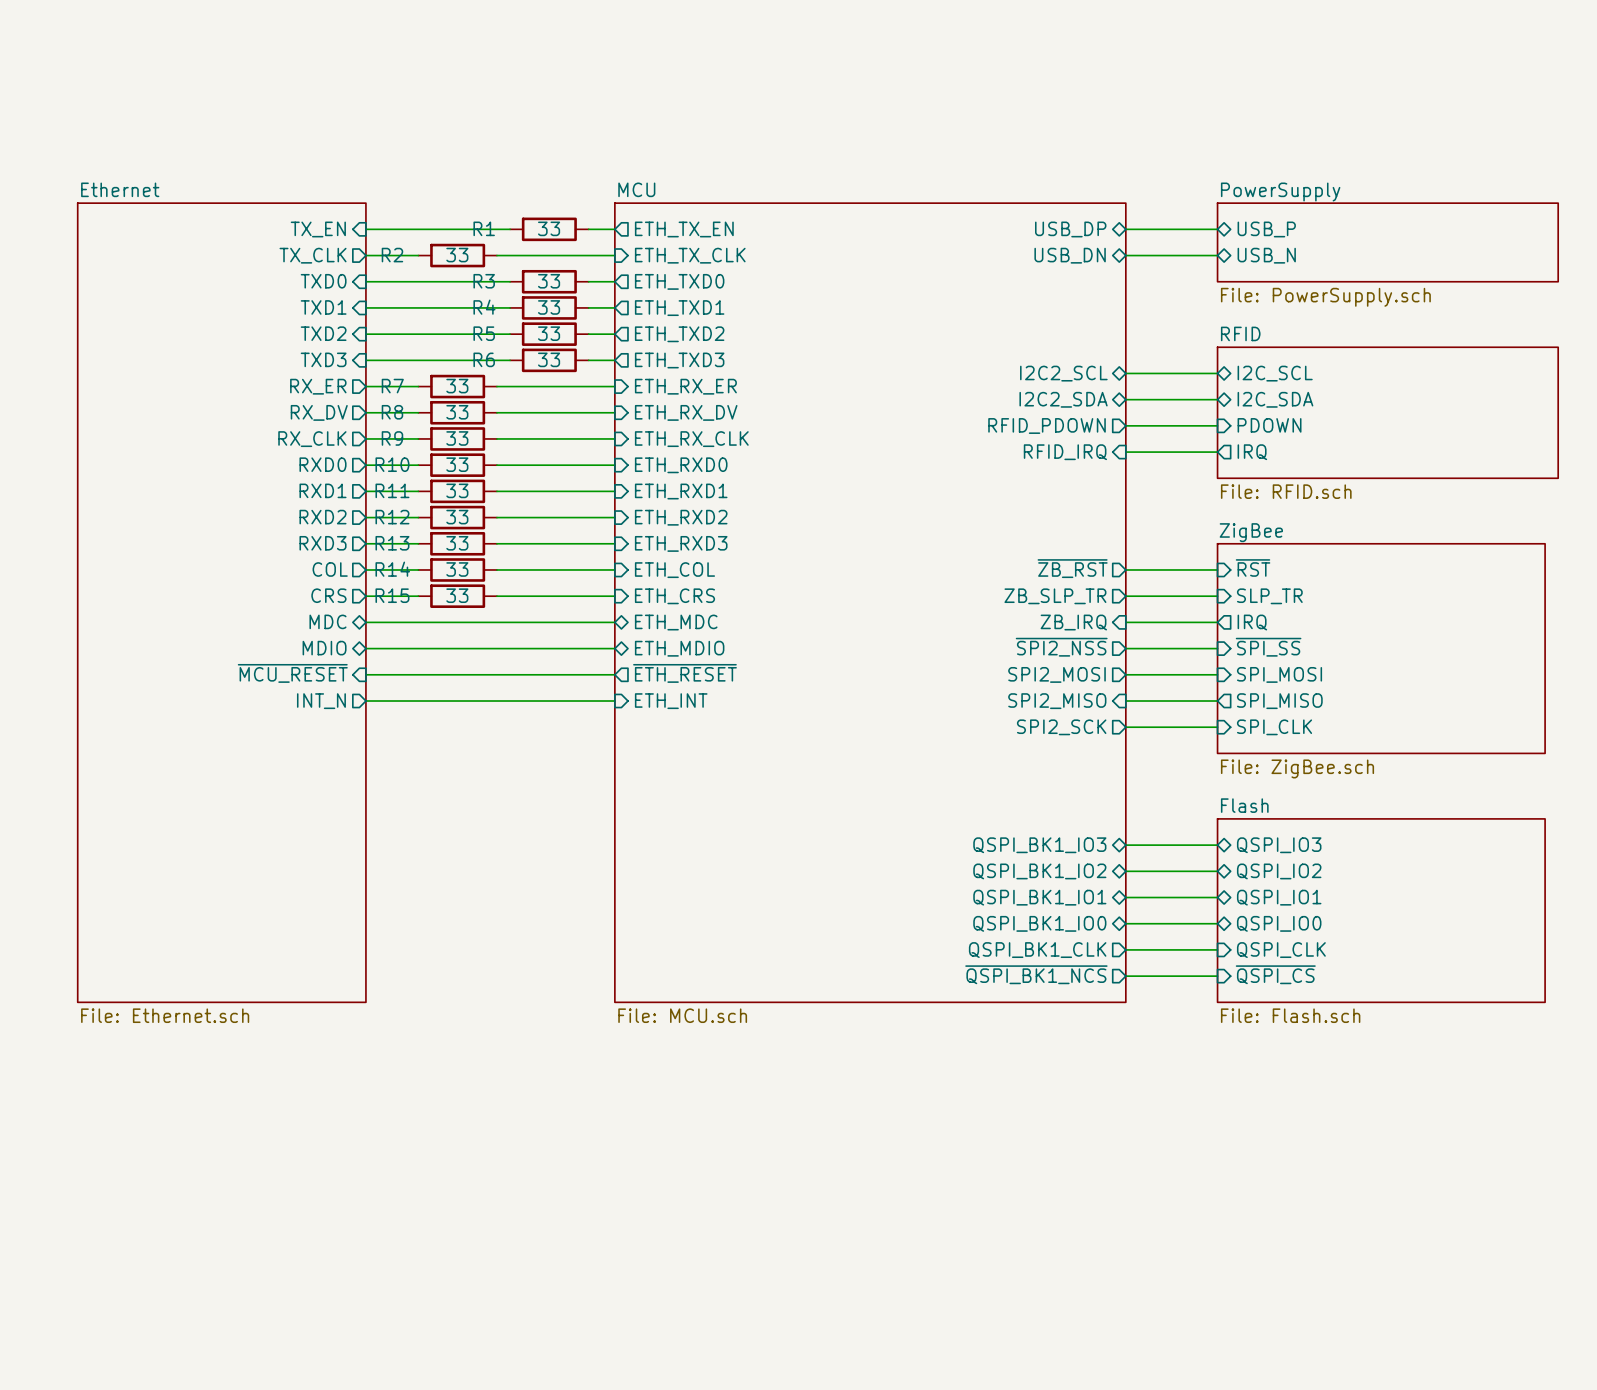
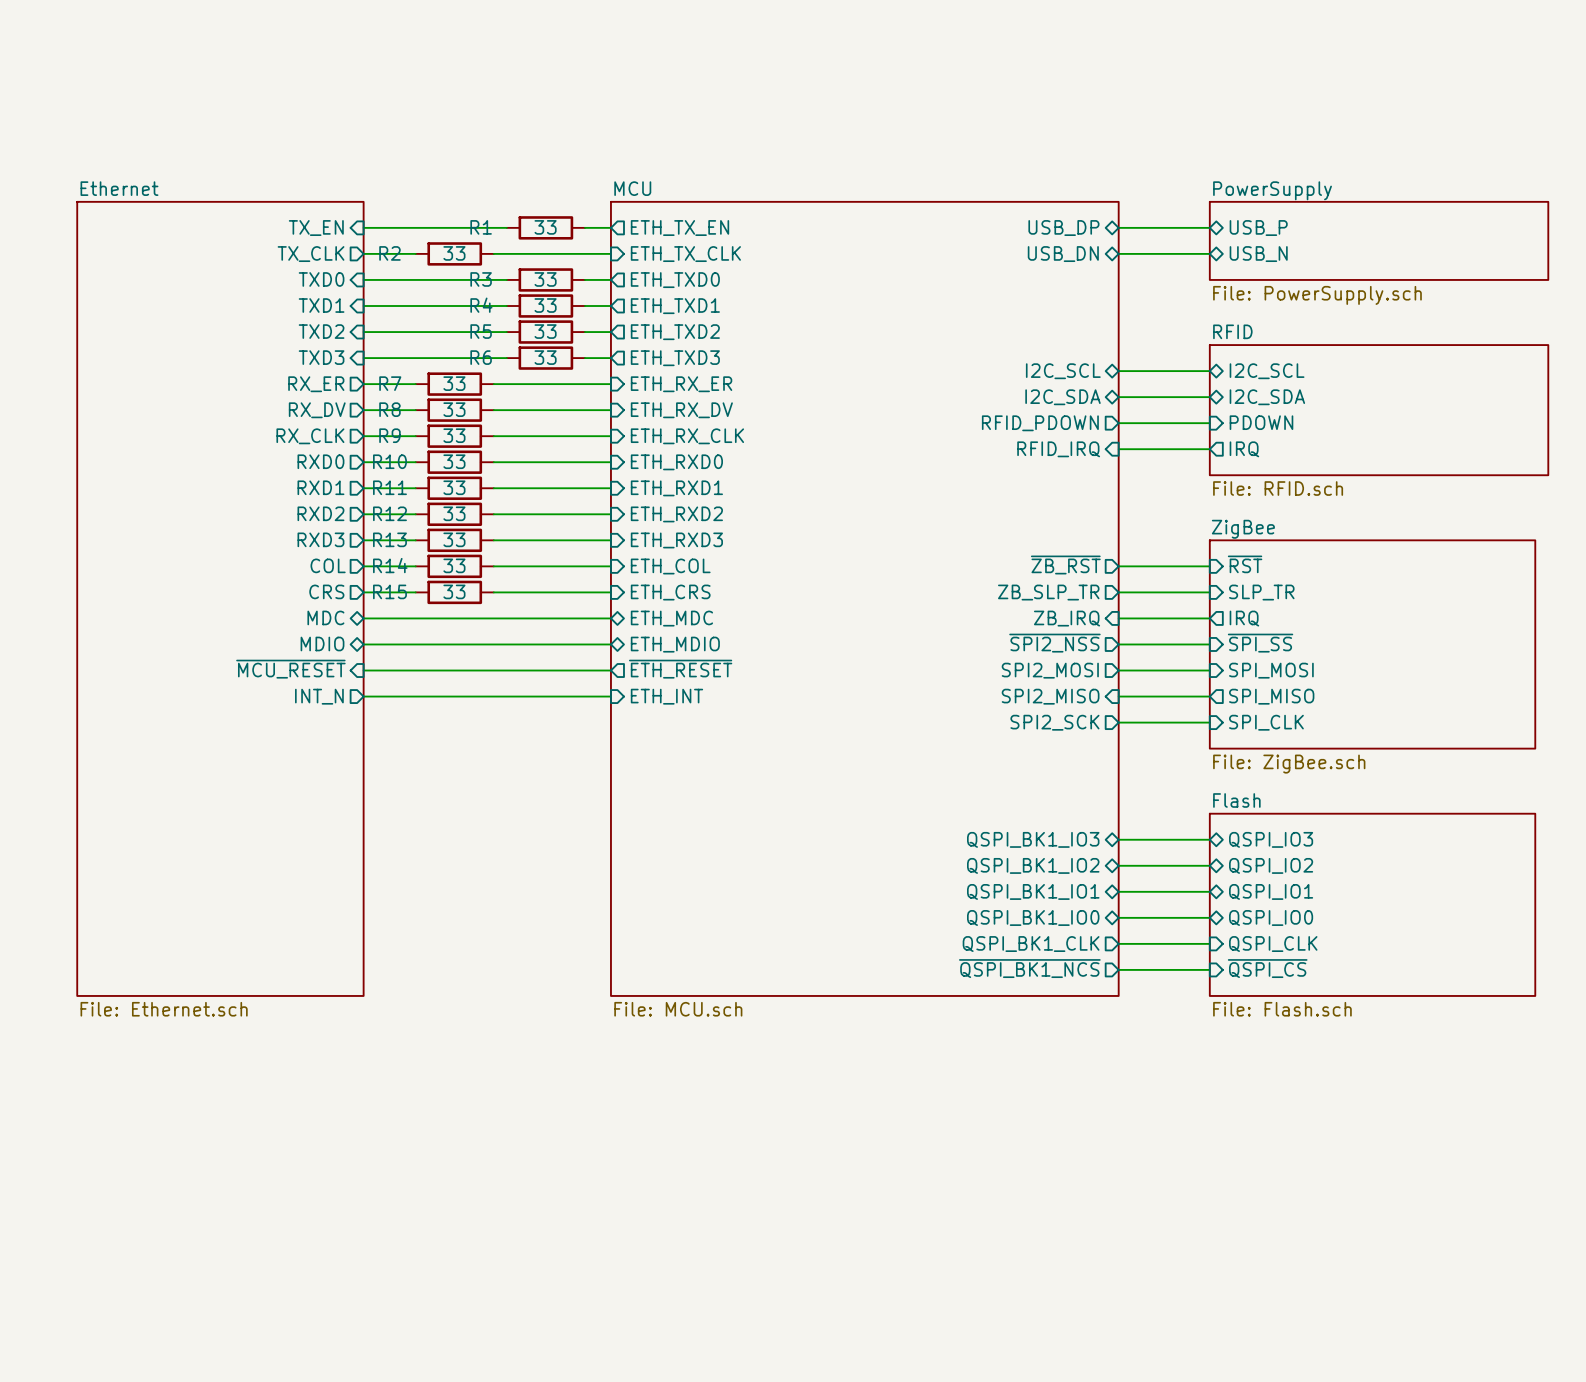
sheet pin: I2C2_SCL (1063, 373) -> I2C_SCL (1063, 371)
sheet pin: I2C2_SDA (1063, 399) -> I2C_SDA (1063, 397)

